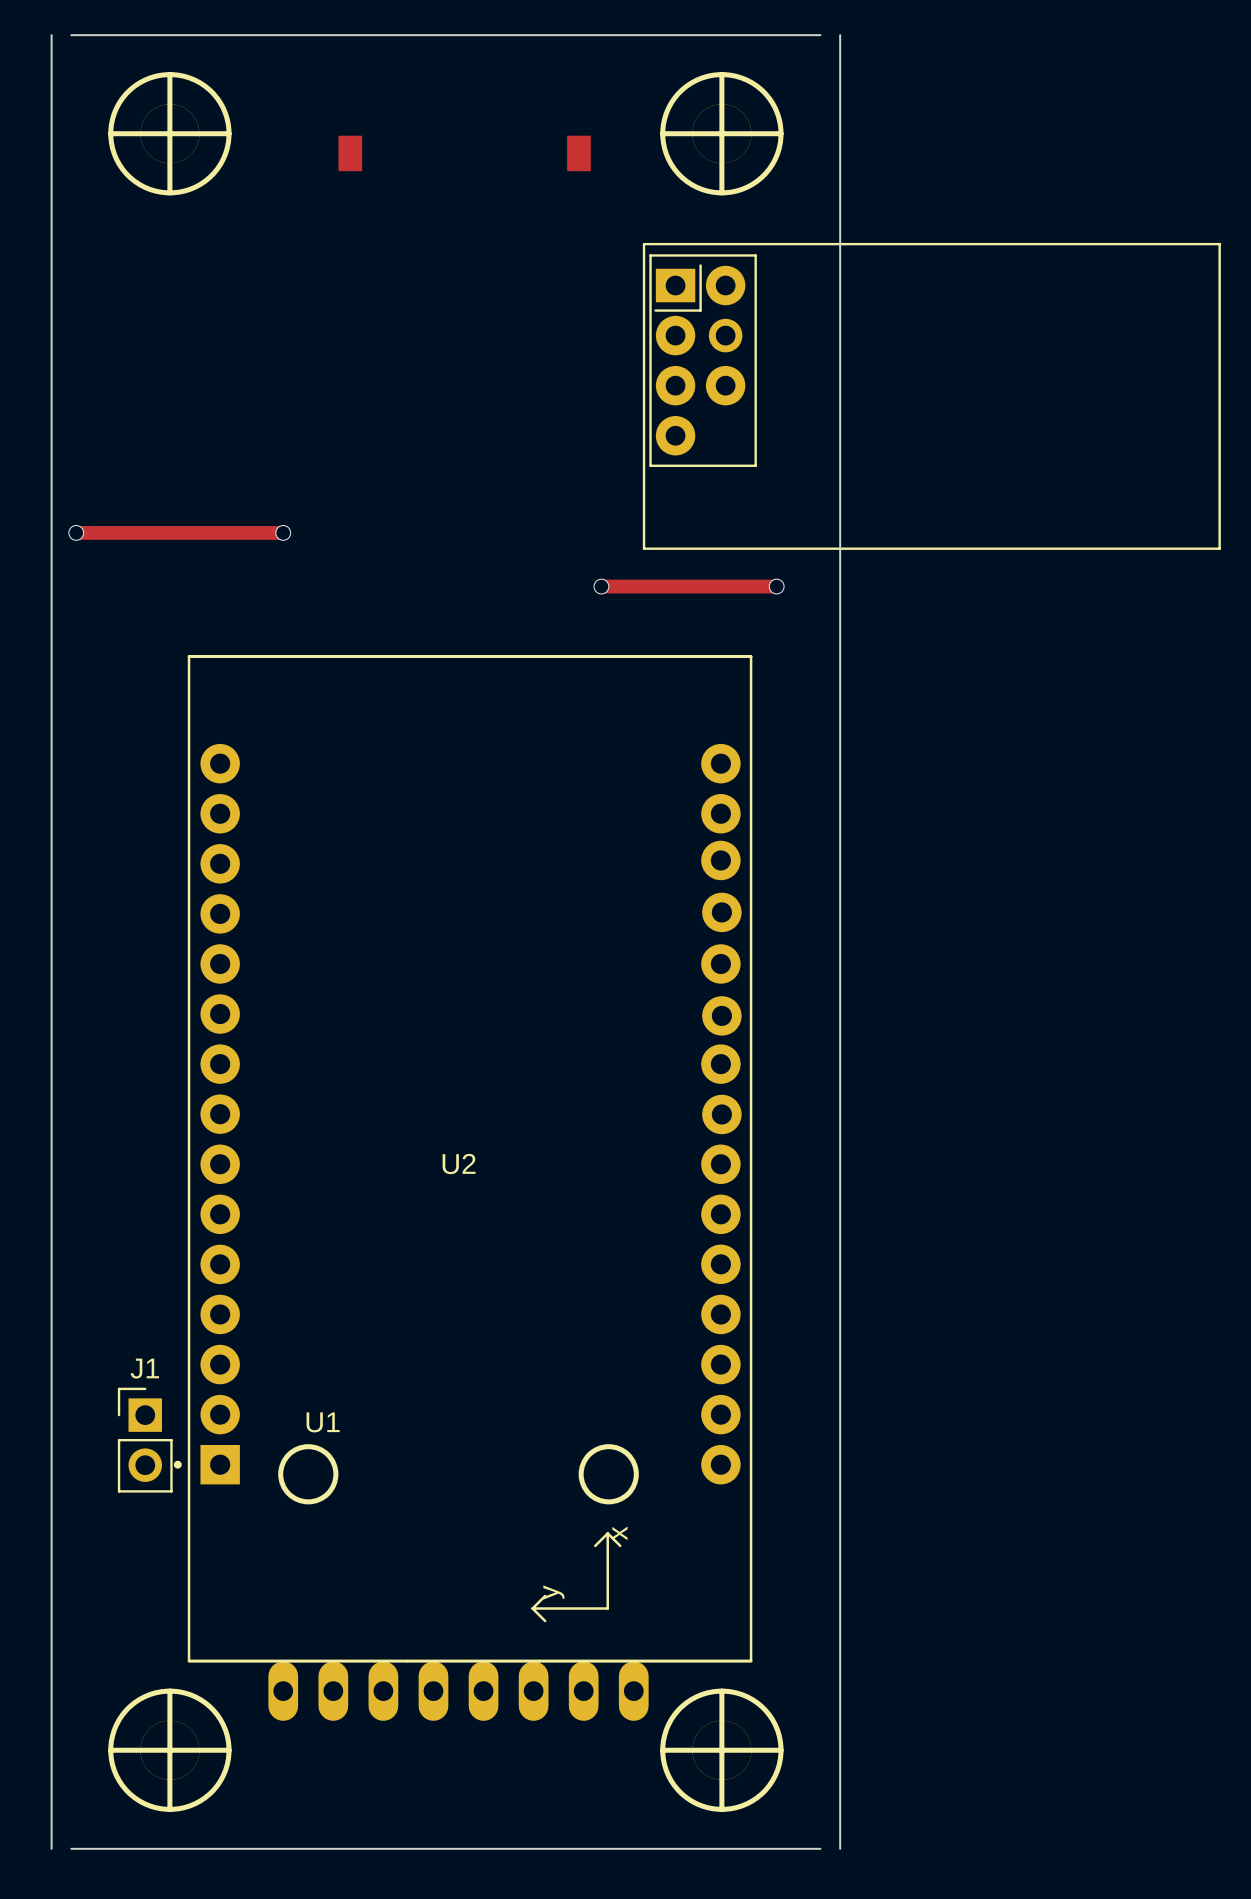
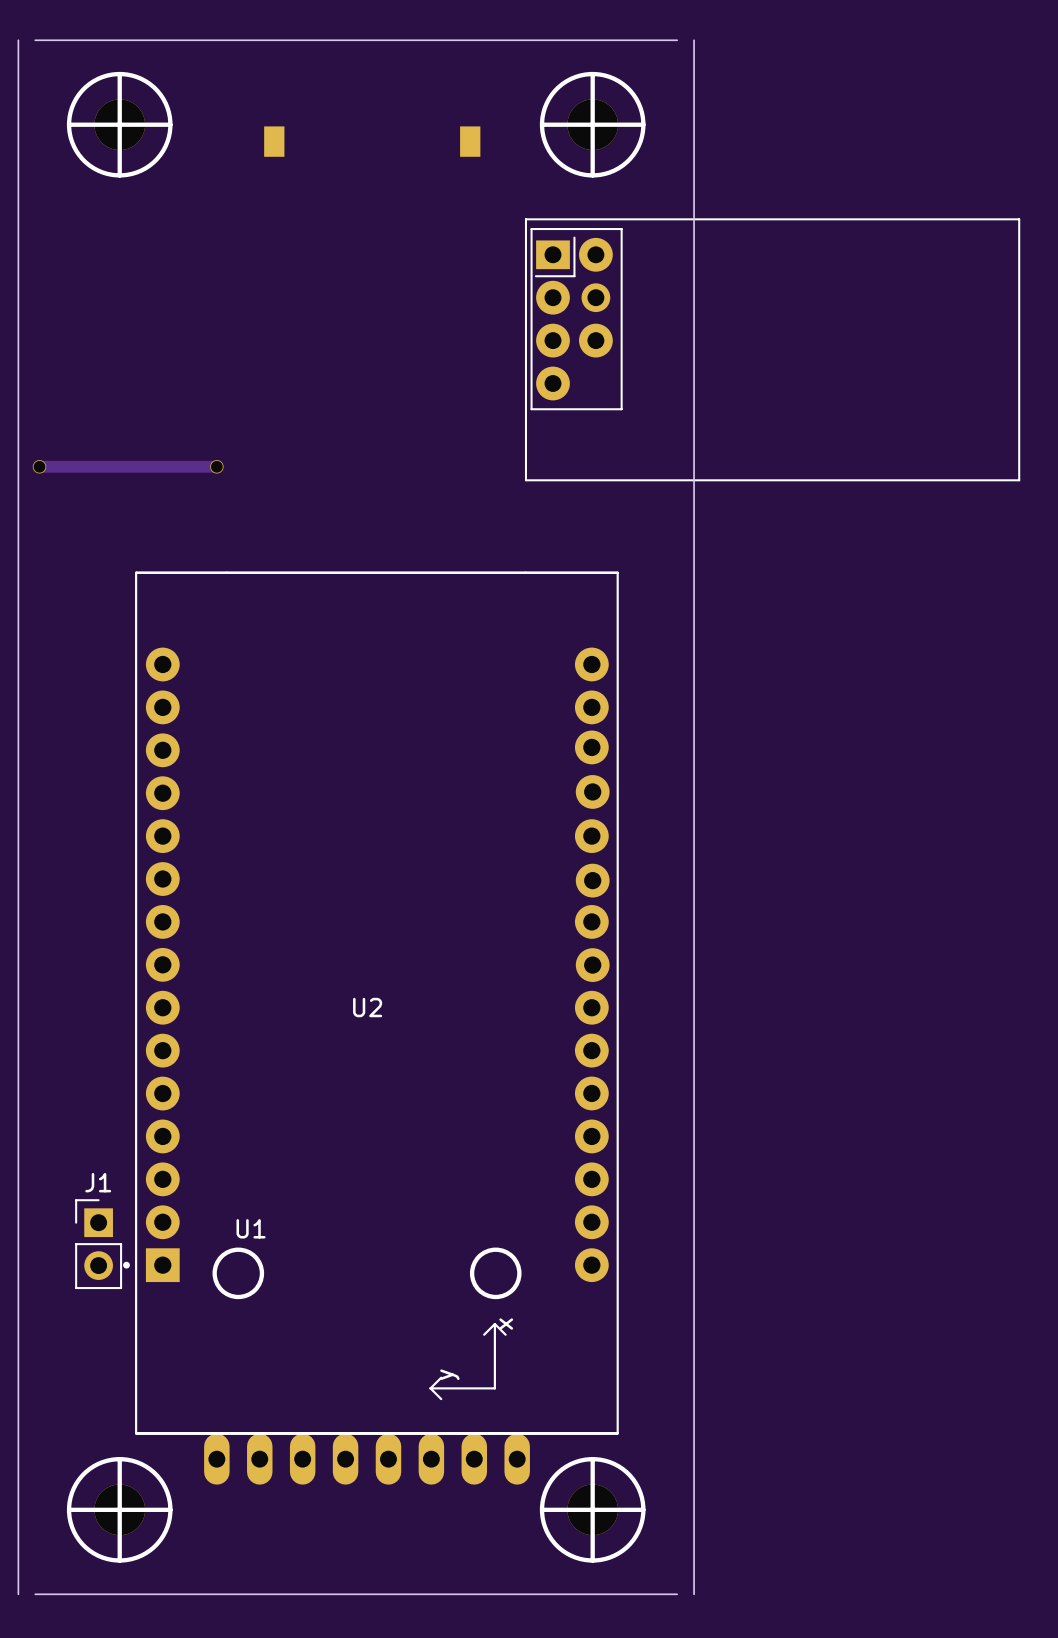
track: (601, 586) (776, 586) -> none
via: (601, 586) -> none
via: (776, 586) -> none

